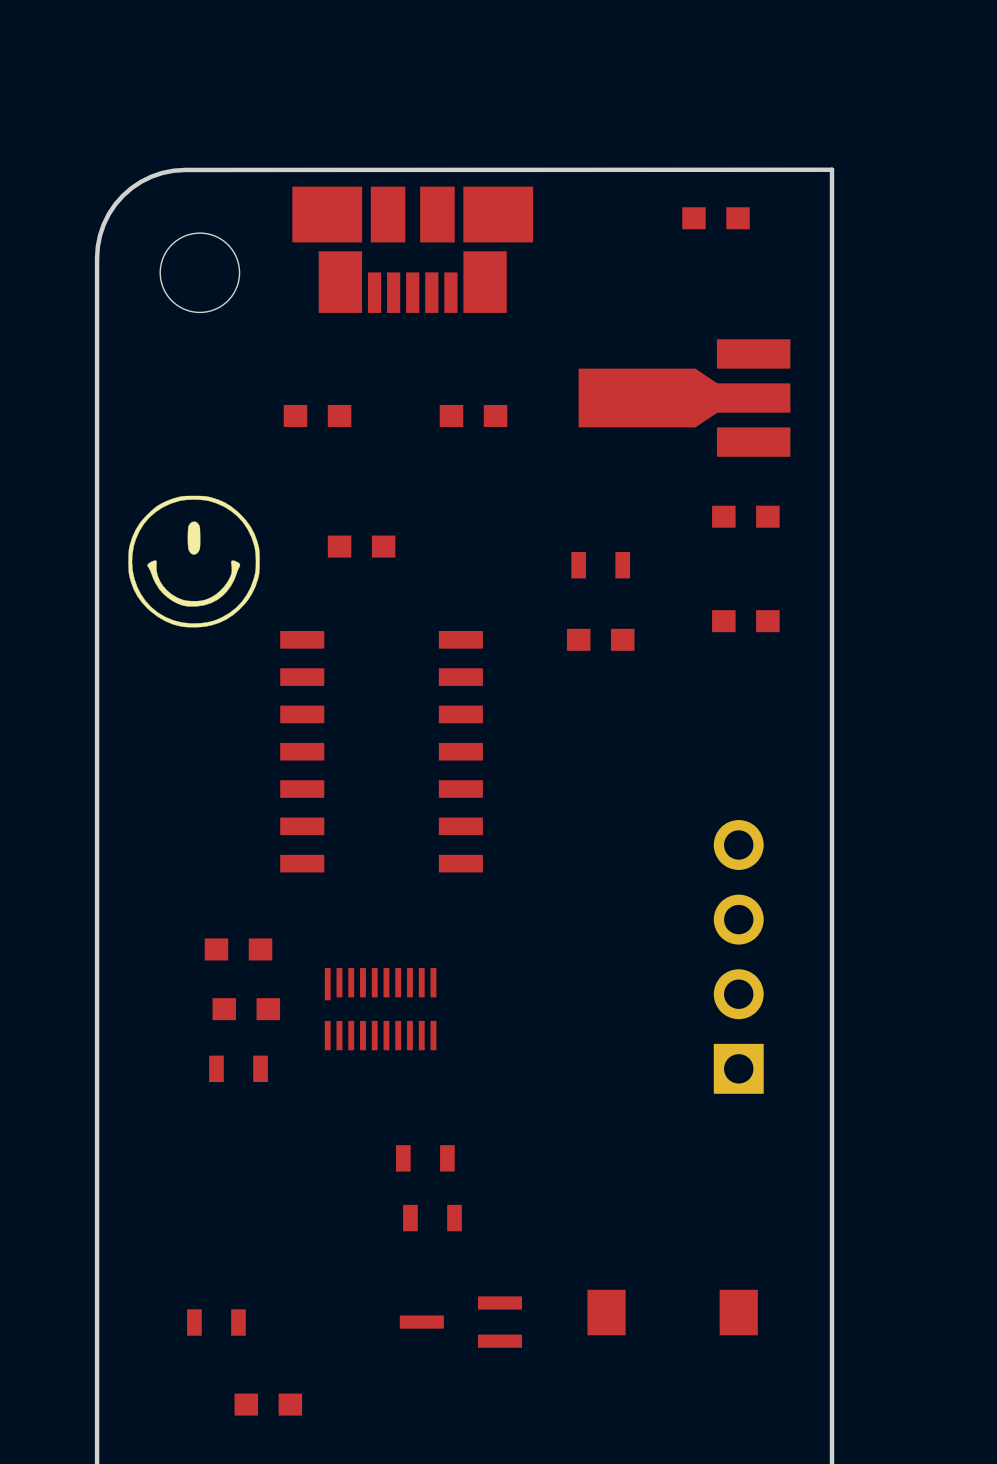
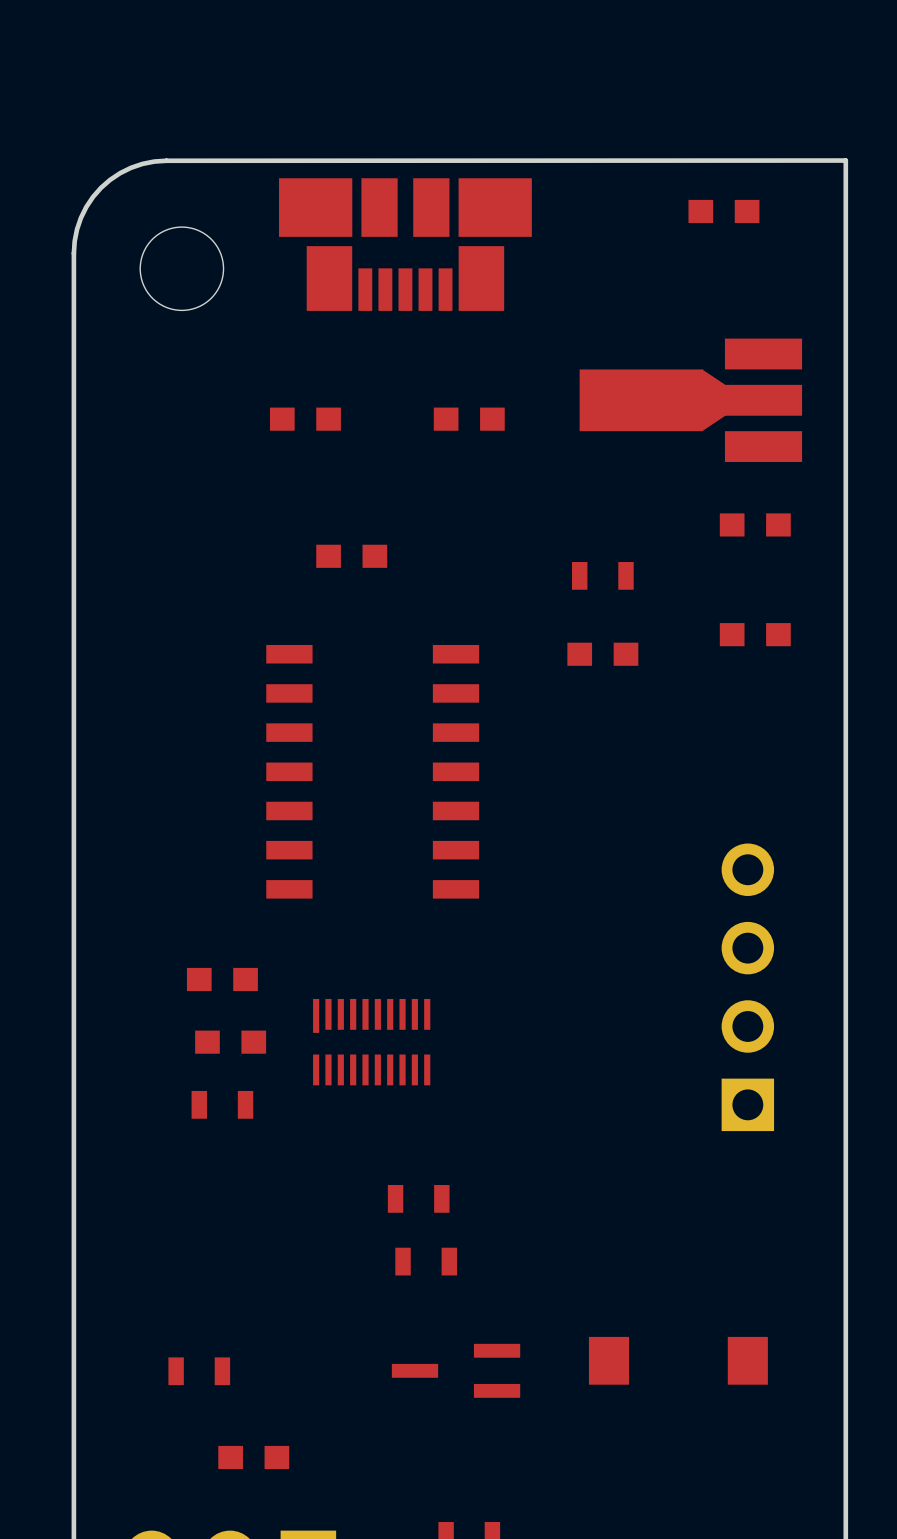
drawing: [128, 495, 260, 628] -> none

